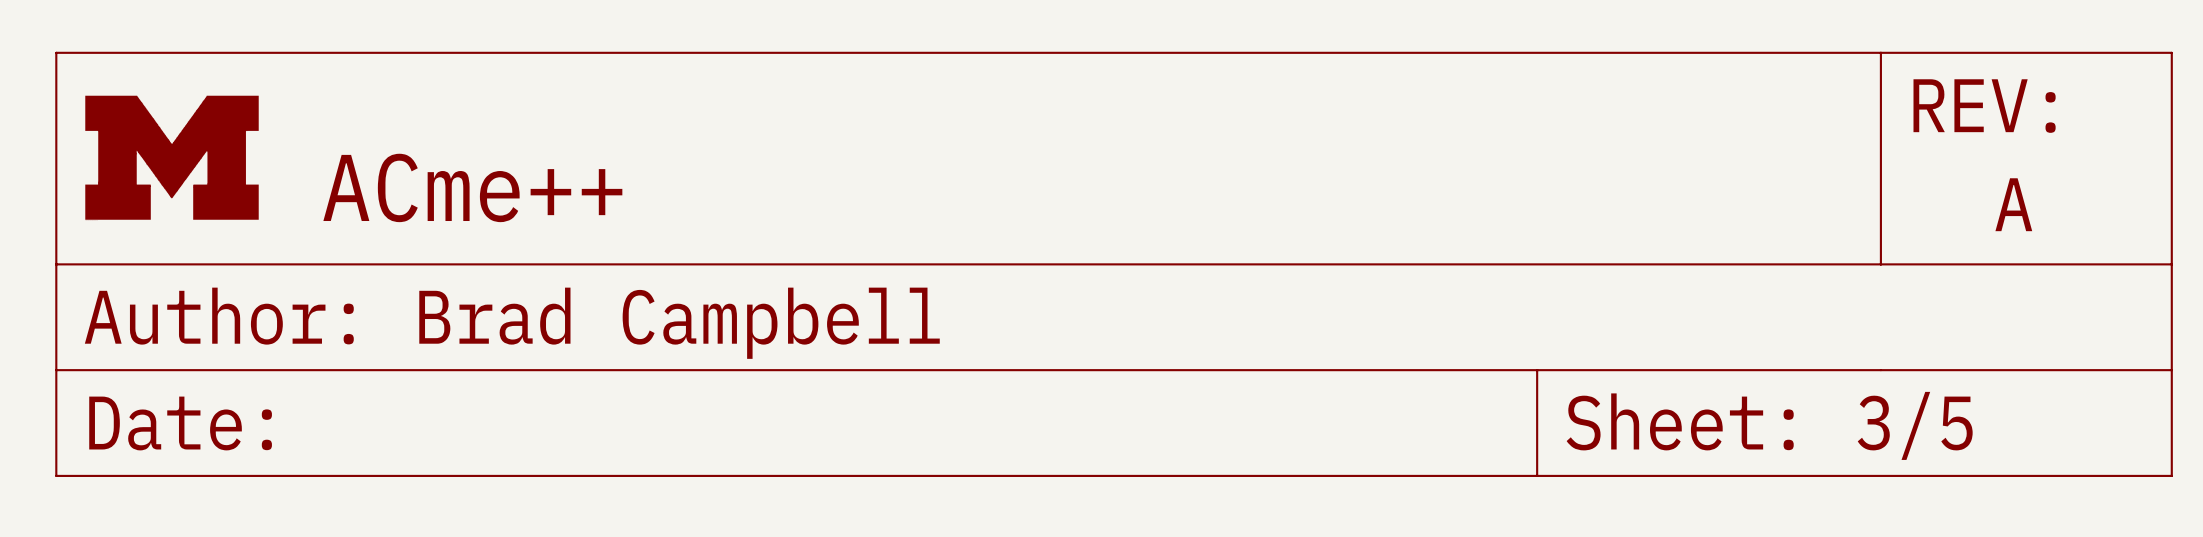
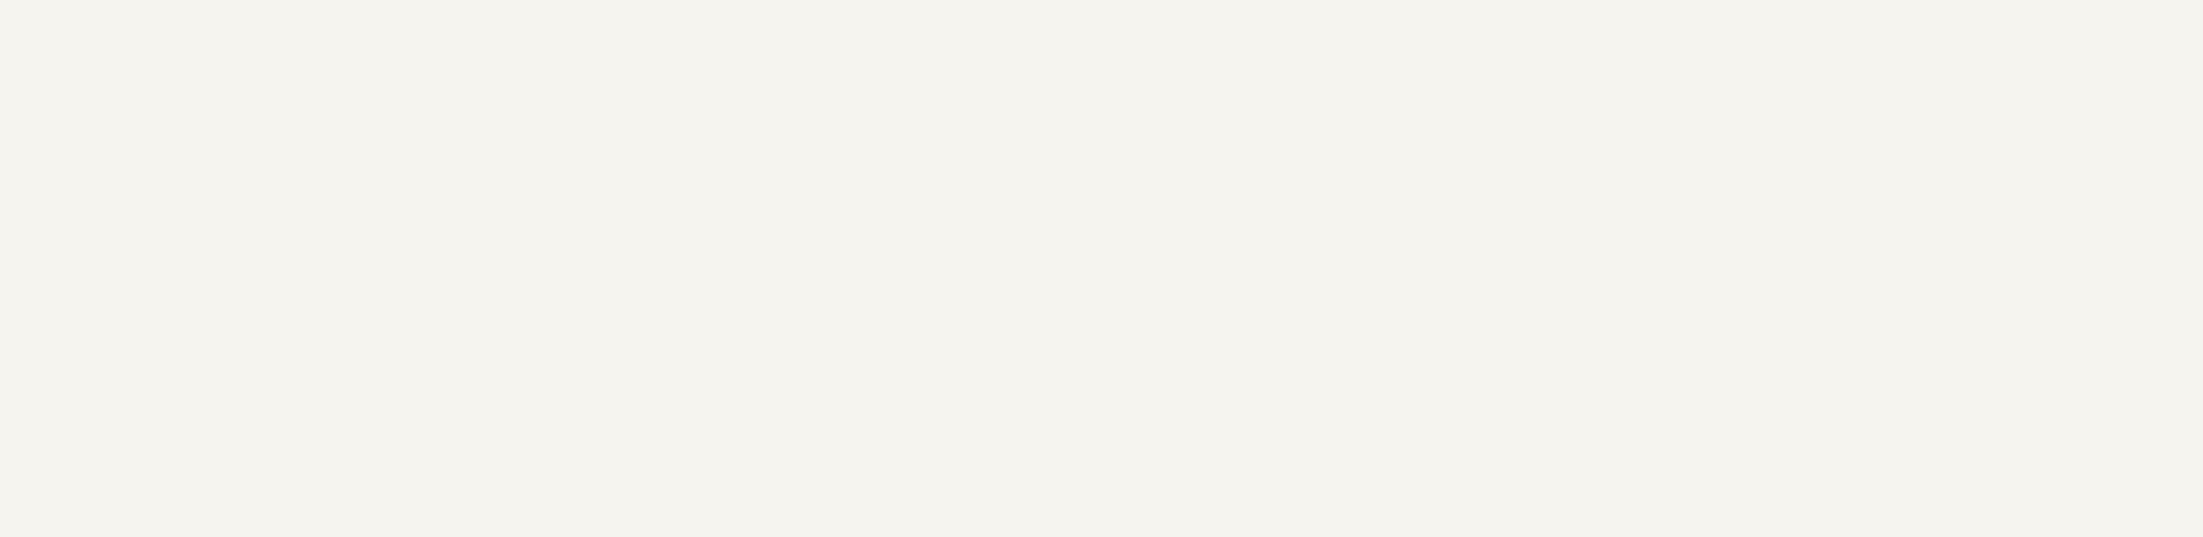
part: (1114, 264) -> none

